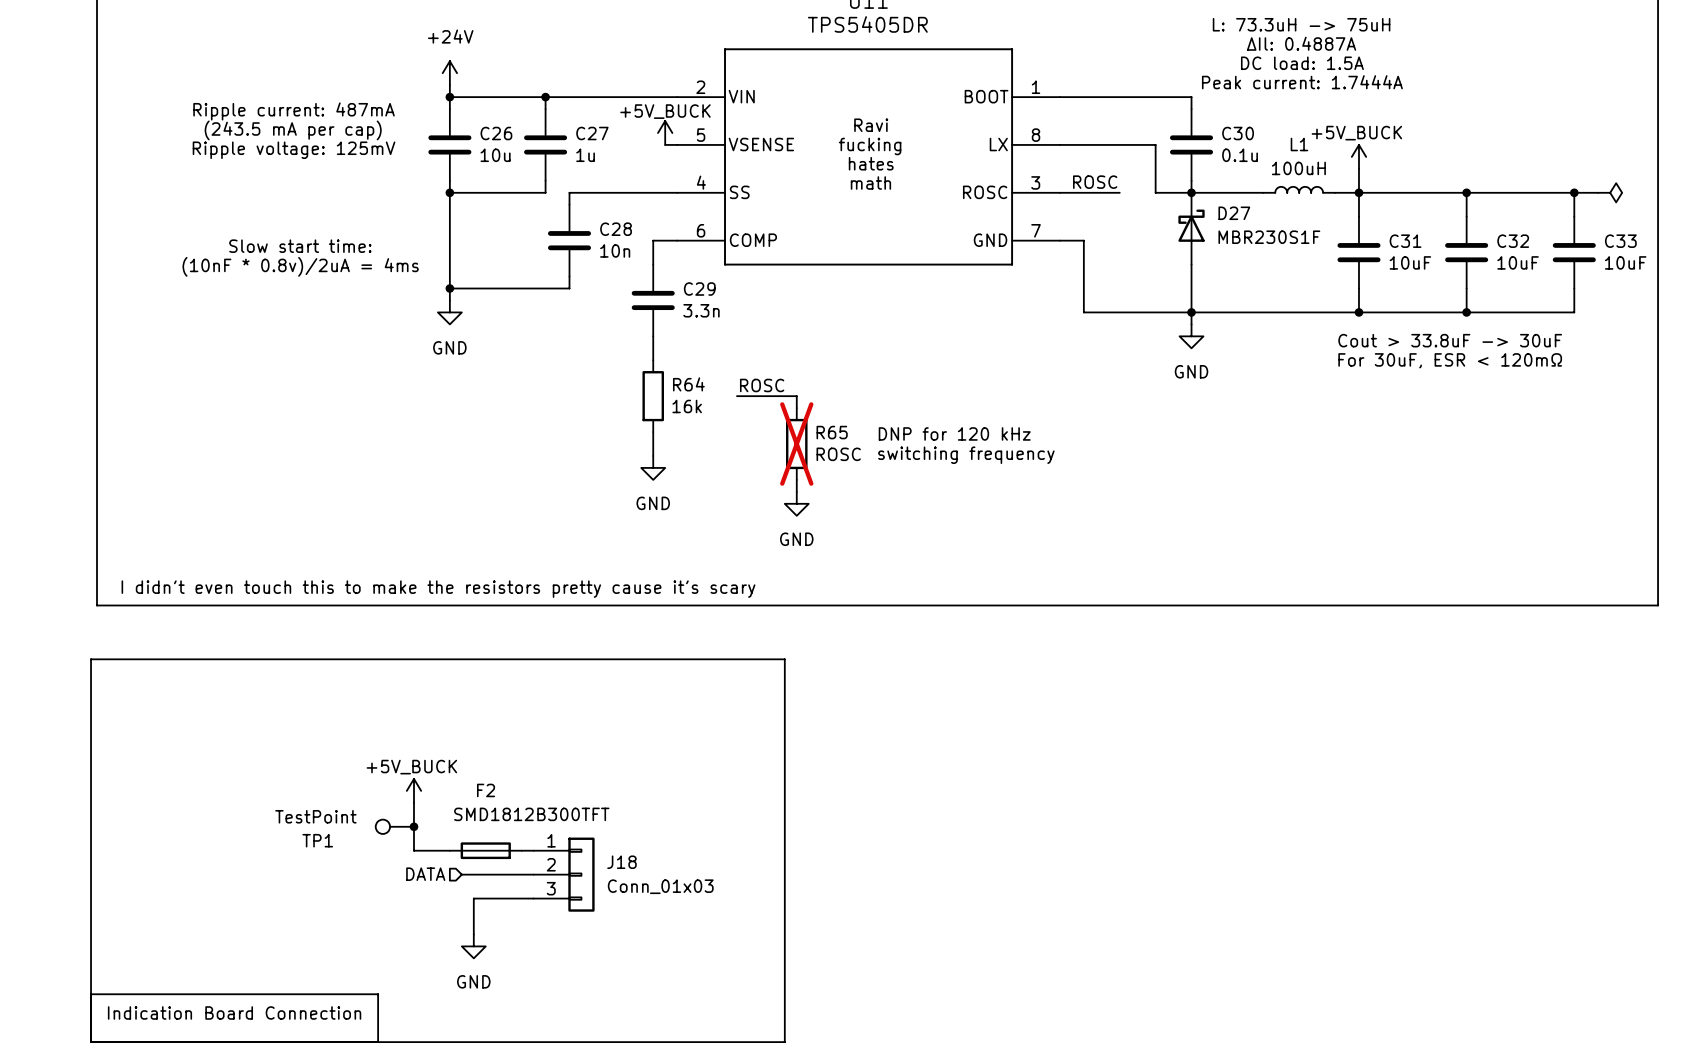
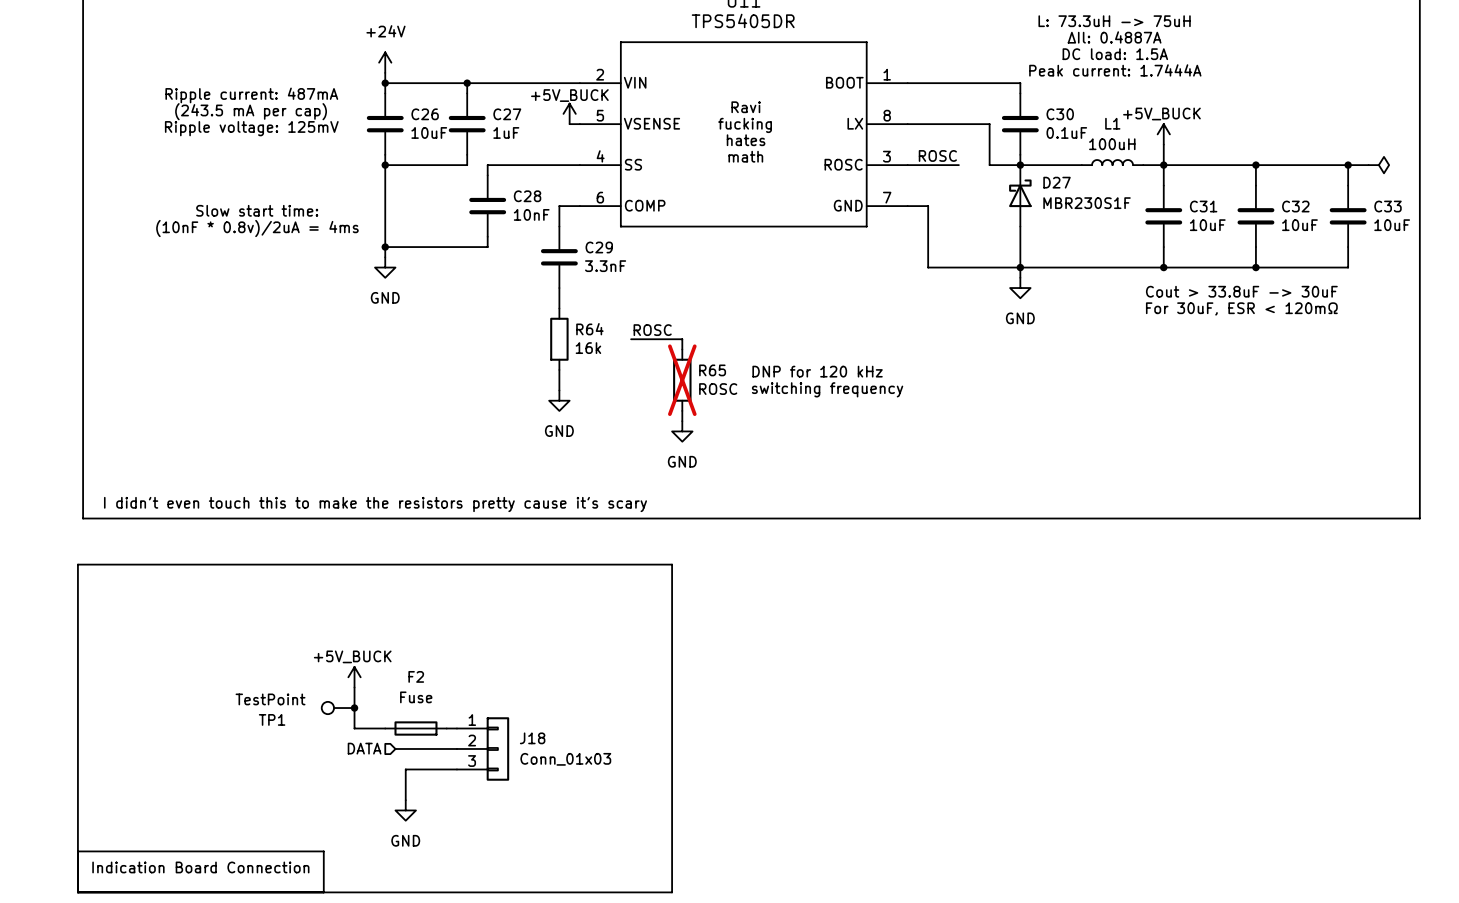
C26 value: 10u (495, 155) -> 10uF (429, 132)
C27 value: 1u (585, 155) -> 1uF (506, 132)
C30 value: 0.1u (1240, 155) -> 0.1uF (1066, 132)
C28 value: 10n (615, 250) -> 10nF (531, 214)
C29 value: 3.3n (701, 310) -> 3.3nF (605, 266)
F2 value: SMD1812B300TFT (531, 814) -> Fuse (416, 697)

